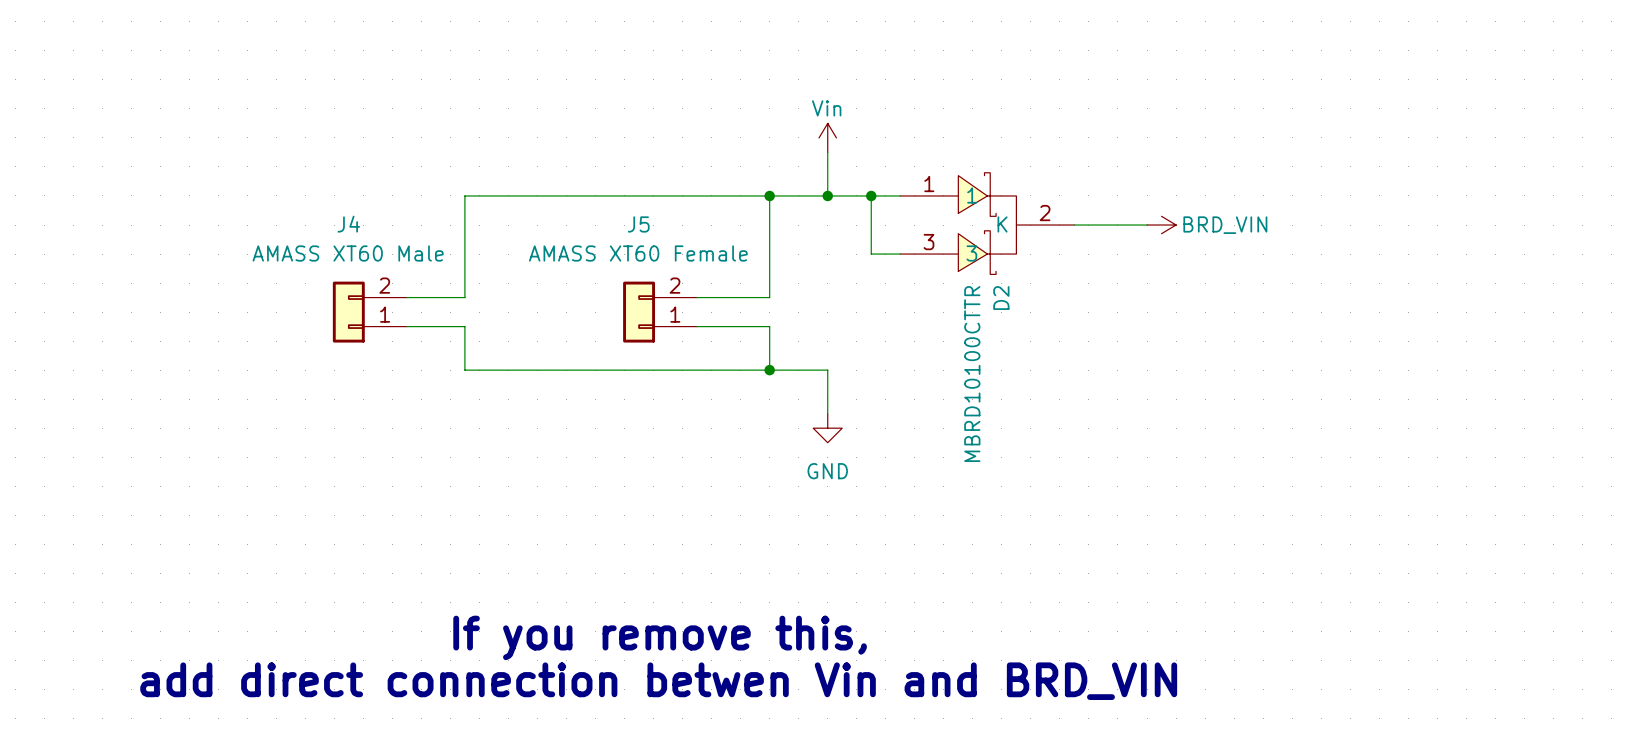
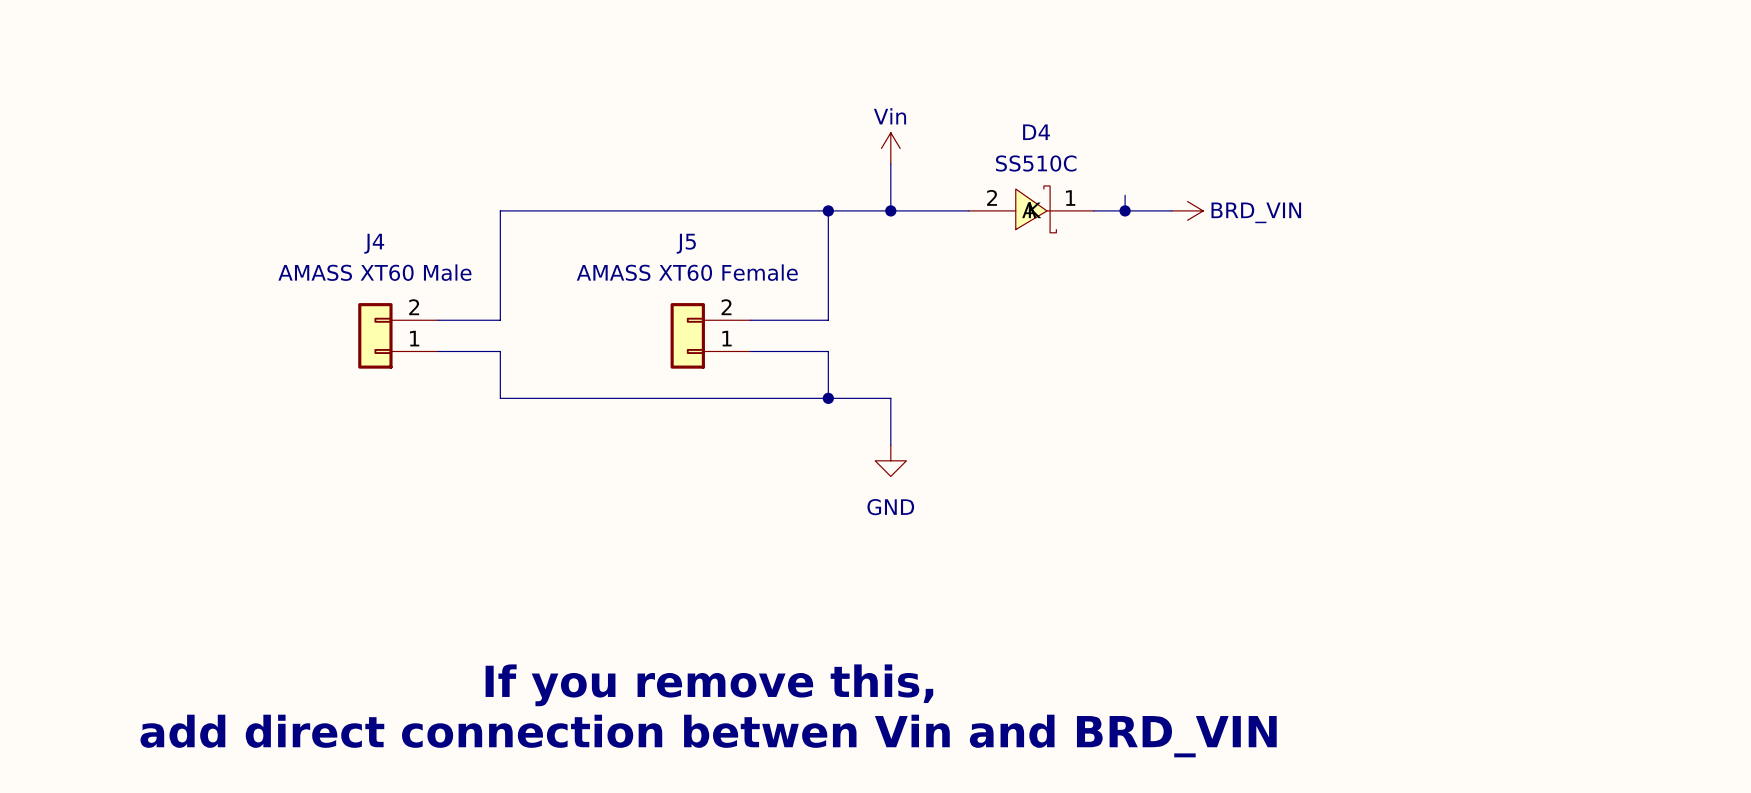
wire: none -> (1125, 195) (1125, 210)
D4: none -> SS510C (1031, 209)
wire: (871, 195) (871, 254) (900, 254) -> none
junction: (871, 195) -> none
junction: none -> (1125, 210)
D2: MBRD10100CTTR (987, 223) -> none
wire: (1074, 225) (1147, 225) -> (1093, 210) (1171, 210)
power symbol position: BRD_VIN (1161, 225) -> BRD_VIN (1187, 210)

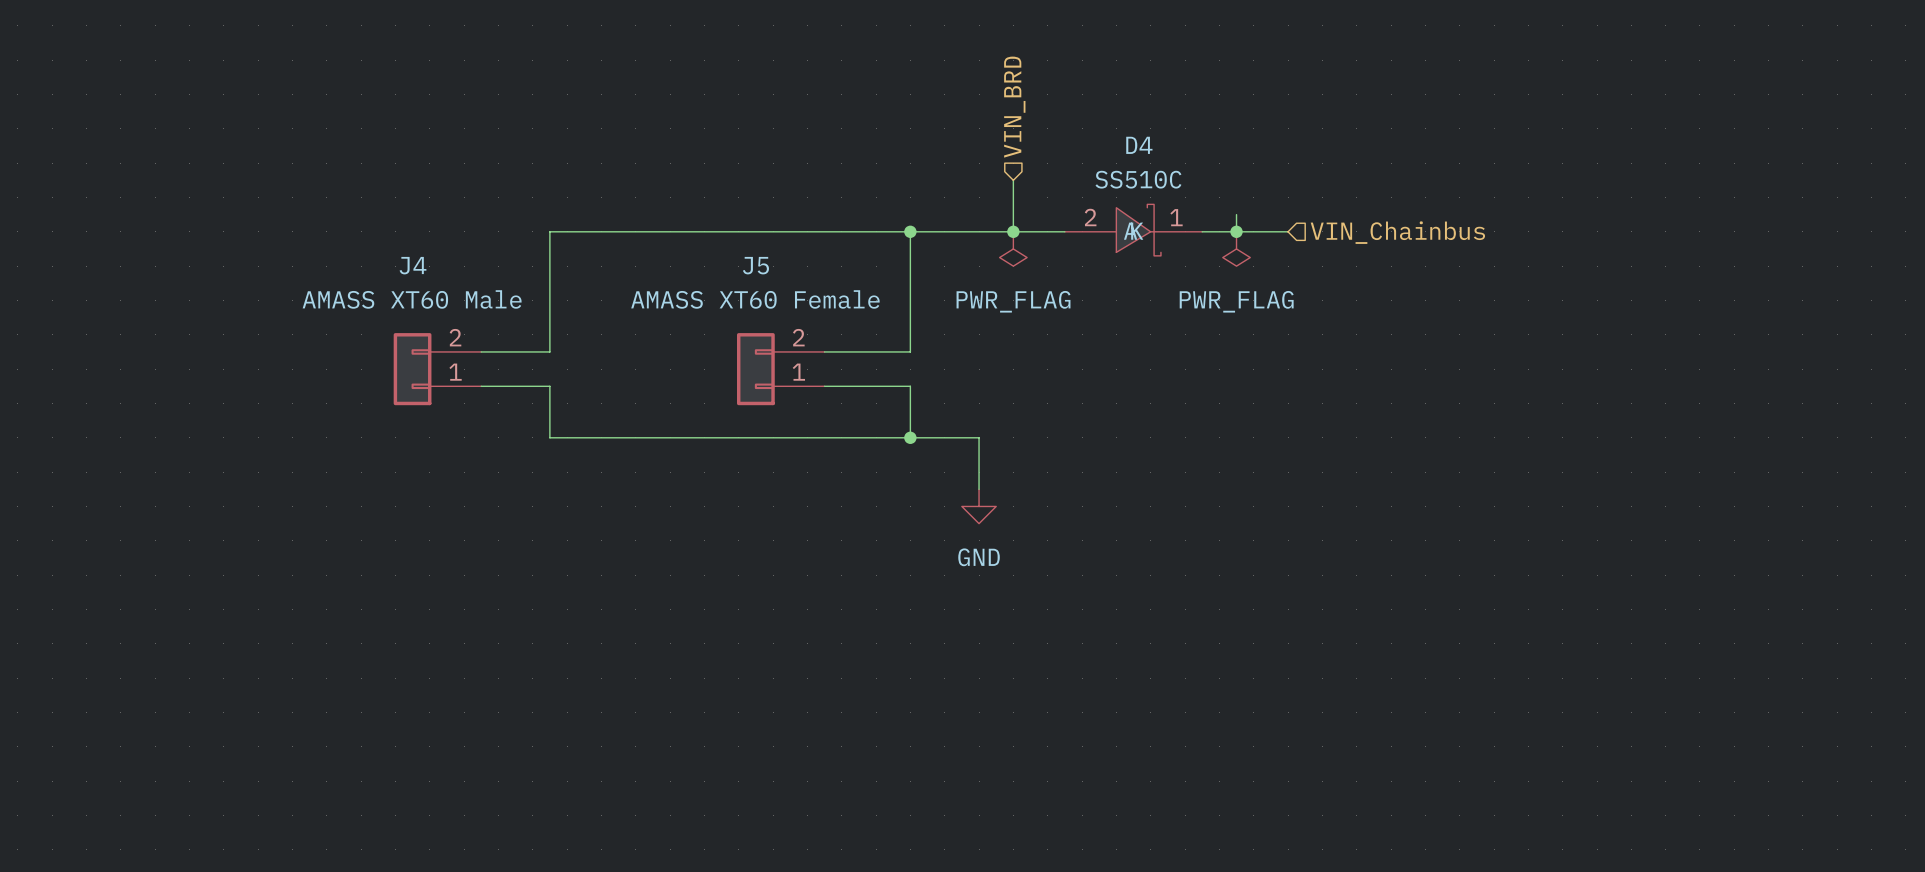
hierarchical label: none -> VIN_BRD (1014, 107)
power symbol: Vin (890, 148) -> none
wire: (890, 164) (890, 210) -> (1013, 180) (1013, 231)
junction position: (890, 210) -> (1013, 231)
power symbol: BRD_VIN (1187, 210) -> none
hierarchical label: none -> VIN_Chainbus (1397, 232)
power symbol: none -> PWR_FLAG (1013, 248)
power symbol: none -> PWR_FLAG (1236, 248)
text: If you remove this, (709, 685) -> none
text: add direct connection betwen Vin and BRD_VIN (708, 736) -> none

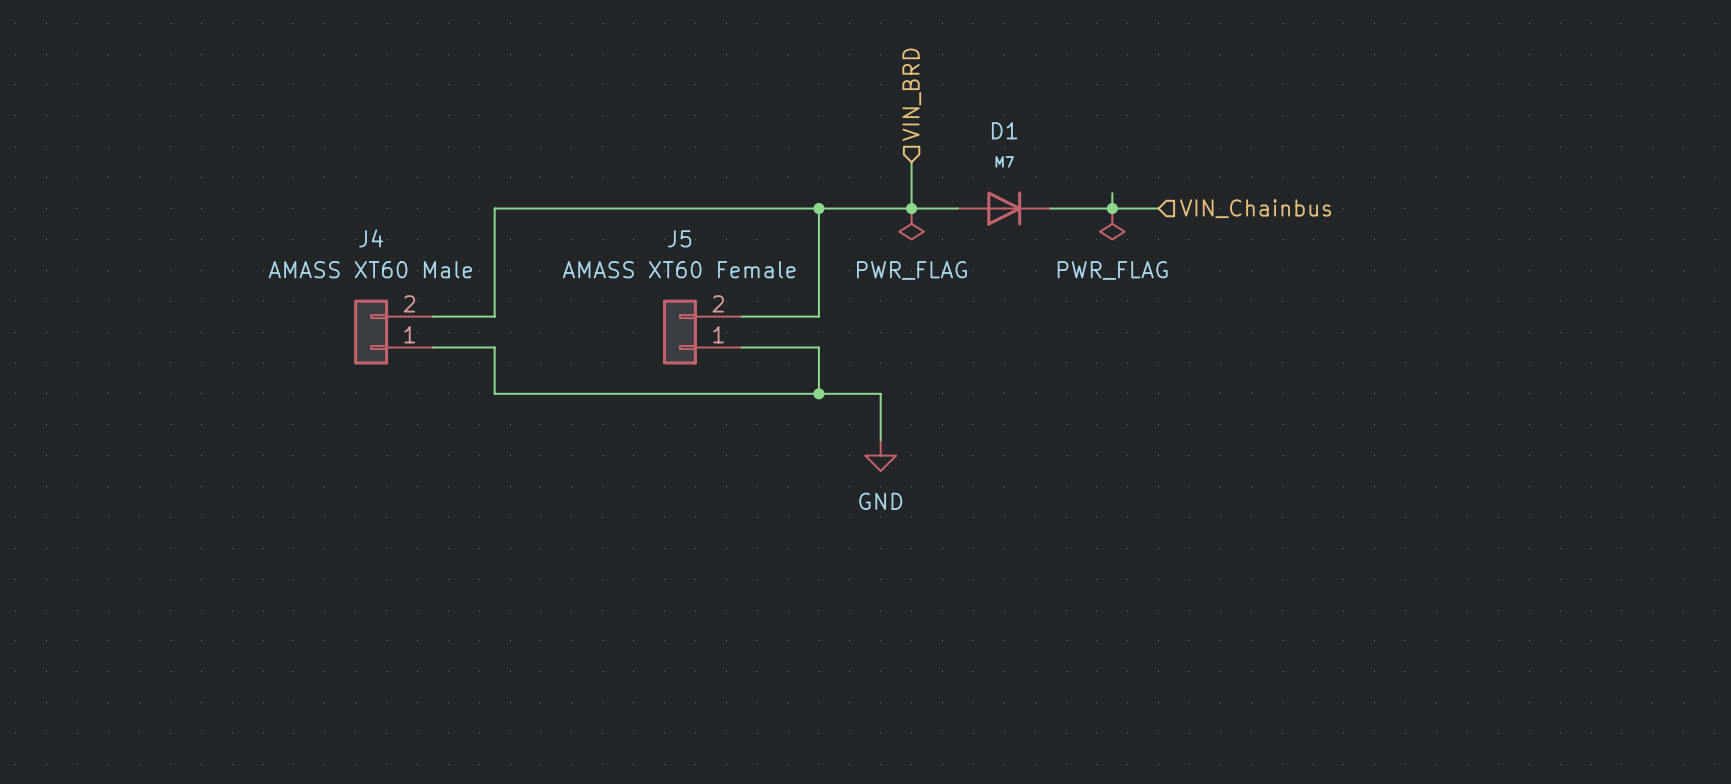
D4: SS510C (1133, 230) -> none
D1: none -> M7 (1004, 208)

